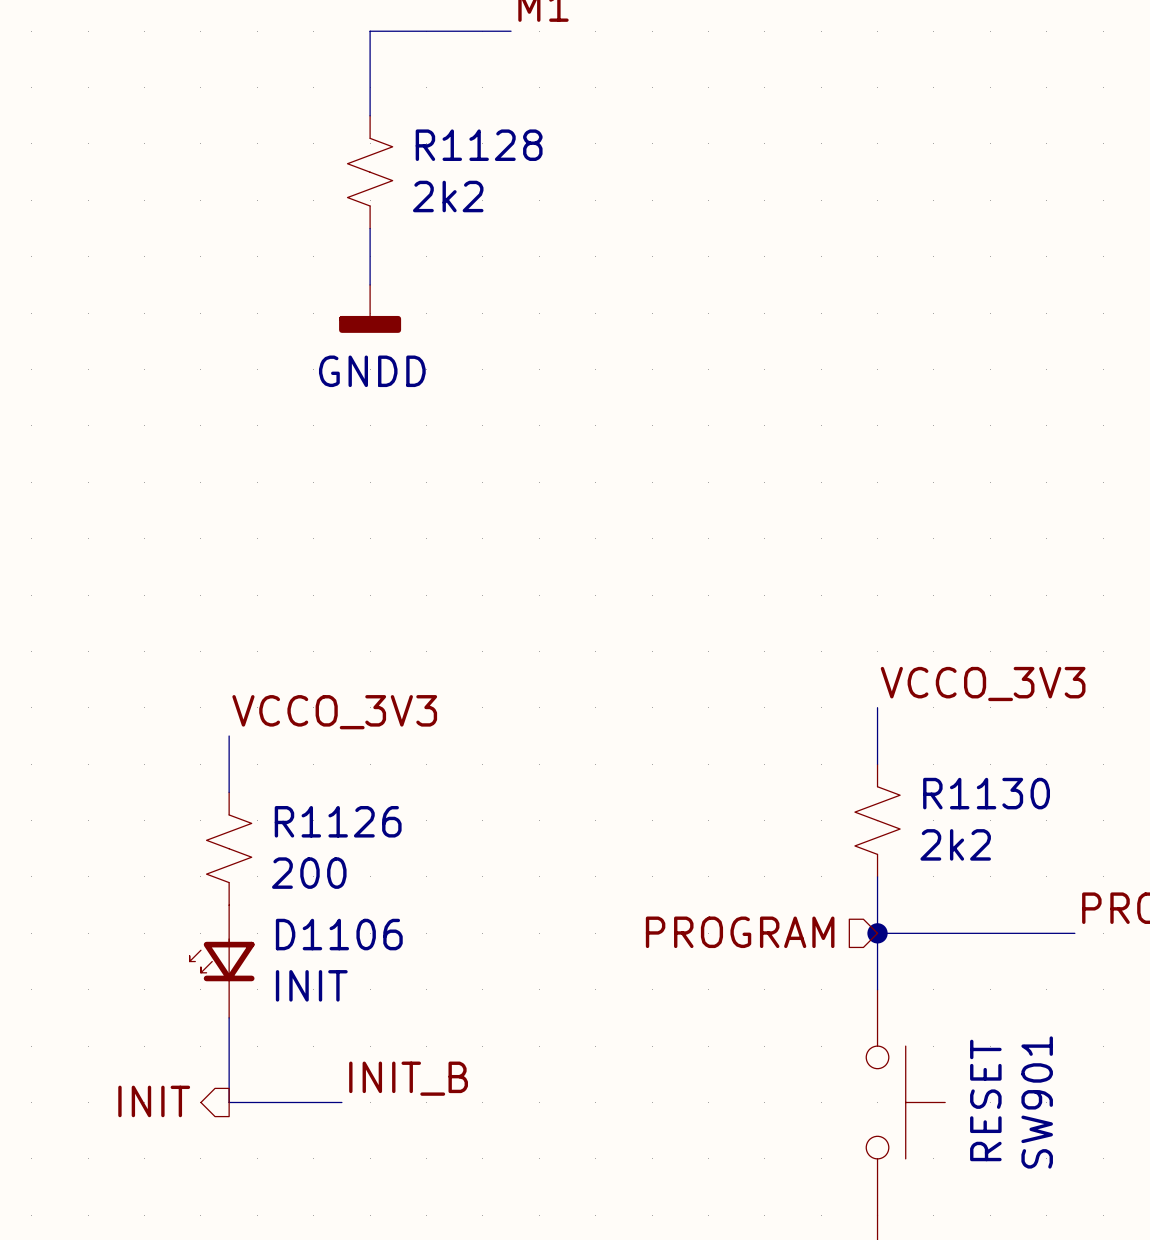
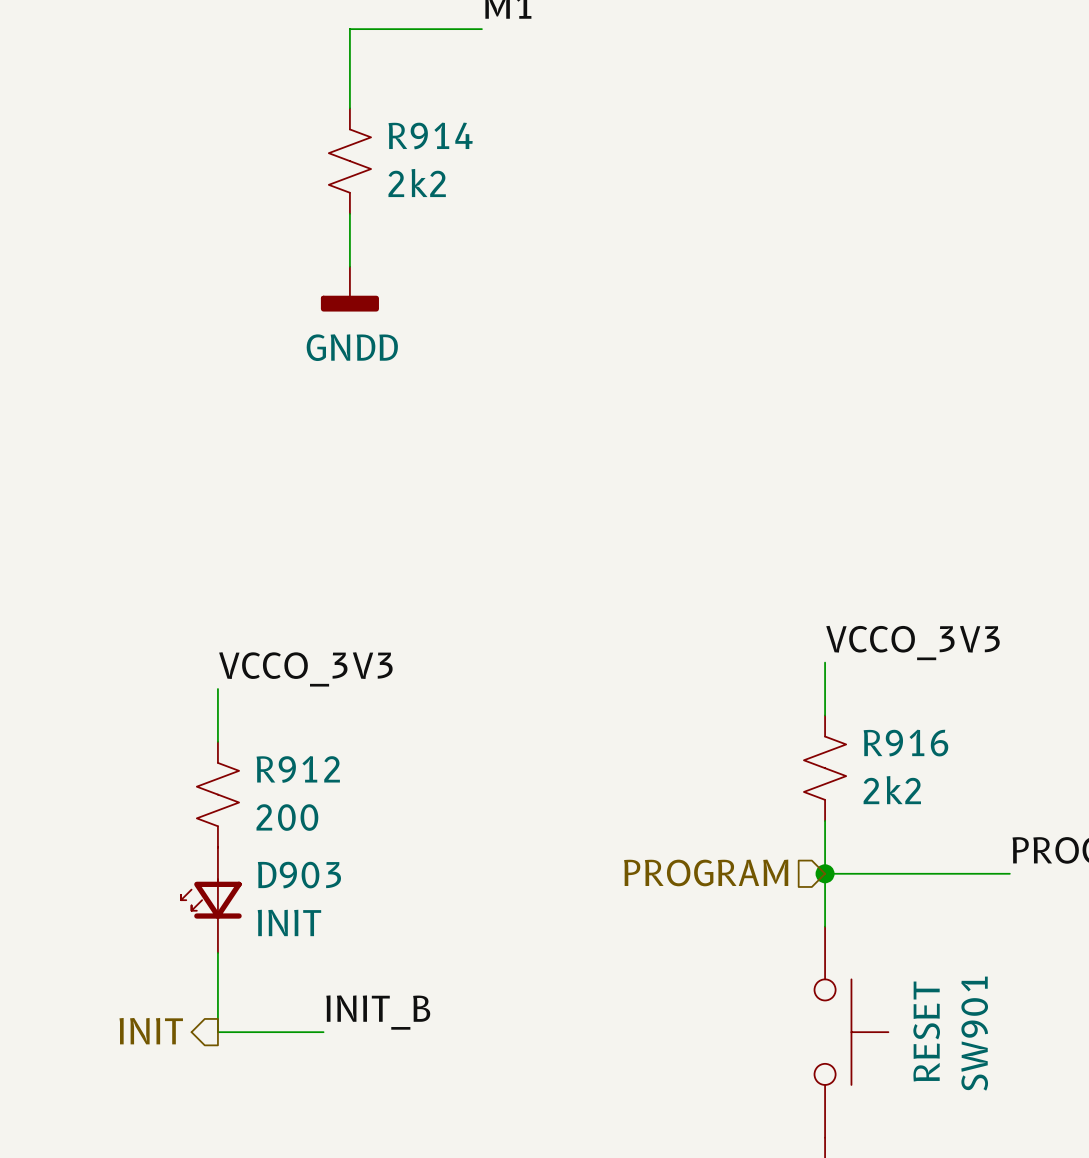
R1128 name: R1128 (479, 145) -> R914 (430, 135)
R1130 name: R1130 (986, 793) -> R916 (905, 743)
R1126 name: R1126 (338, 821) -> R912 (298, 769)
D1106 name: D1106 (339, 934) -> D903 (299, 875)

